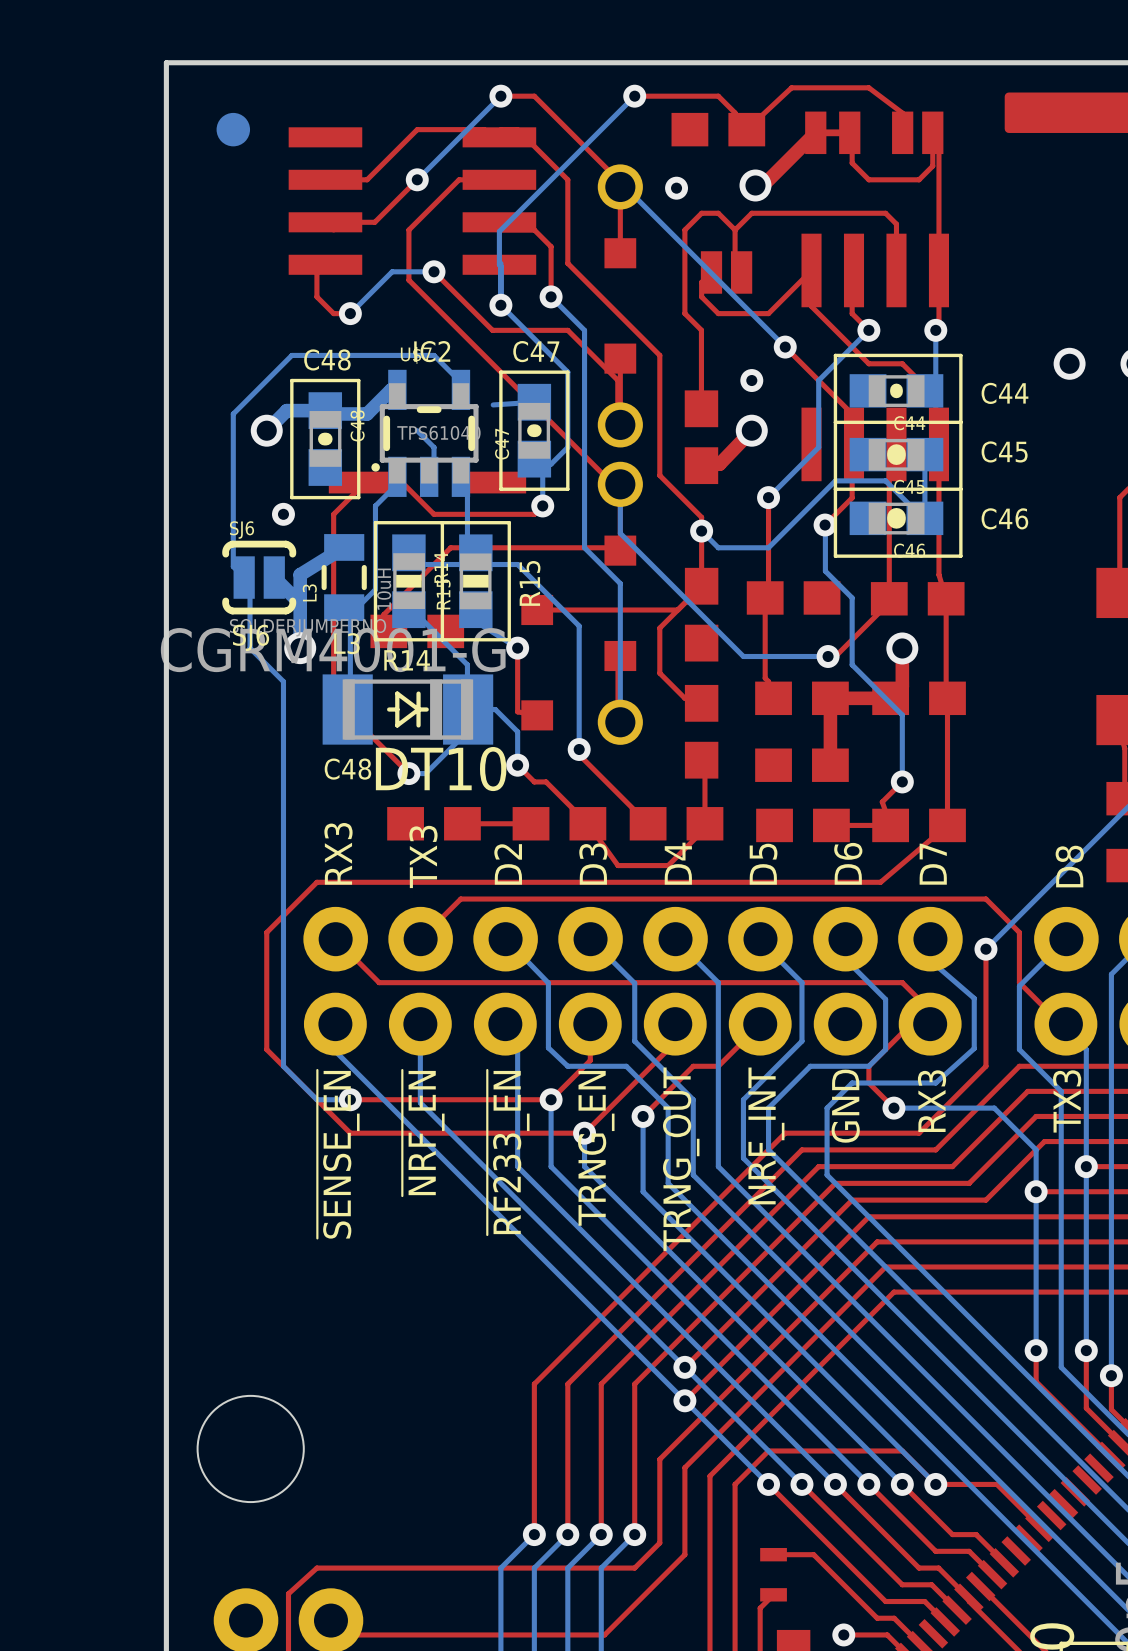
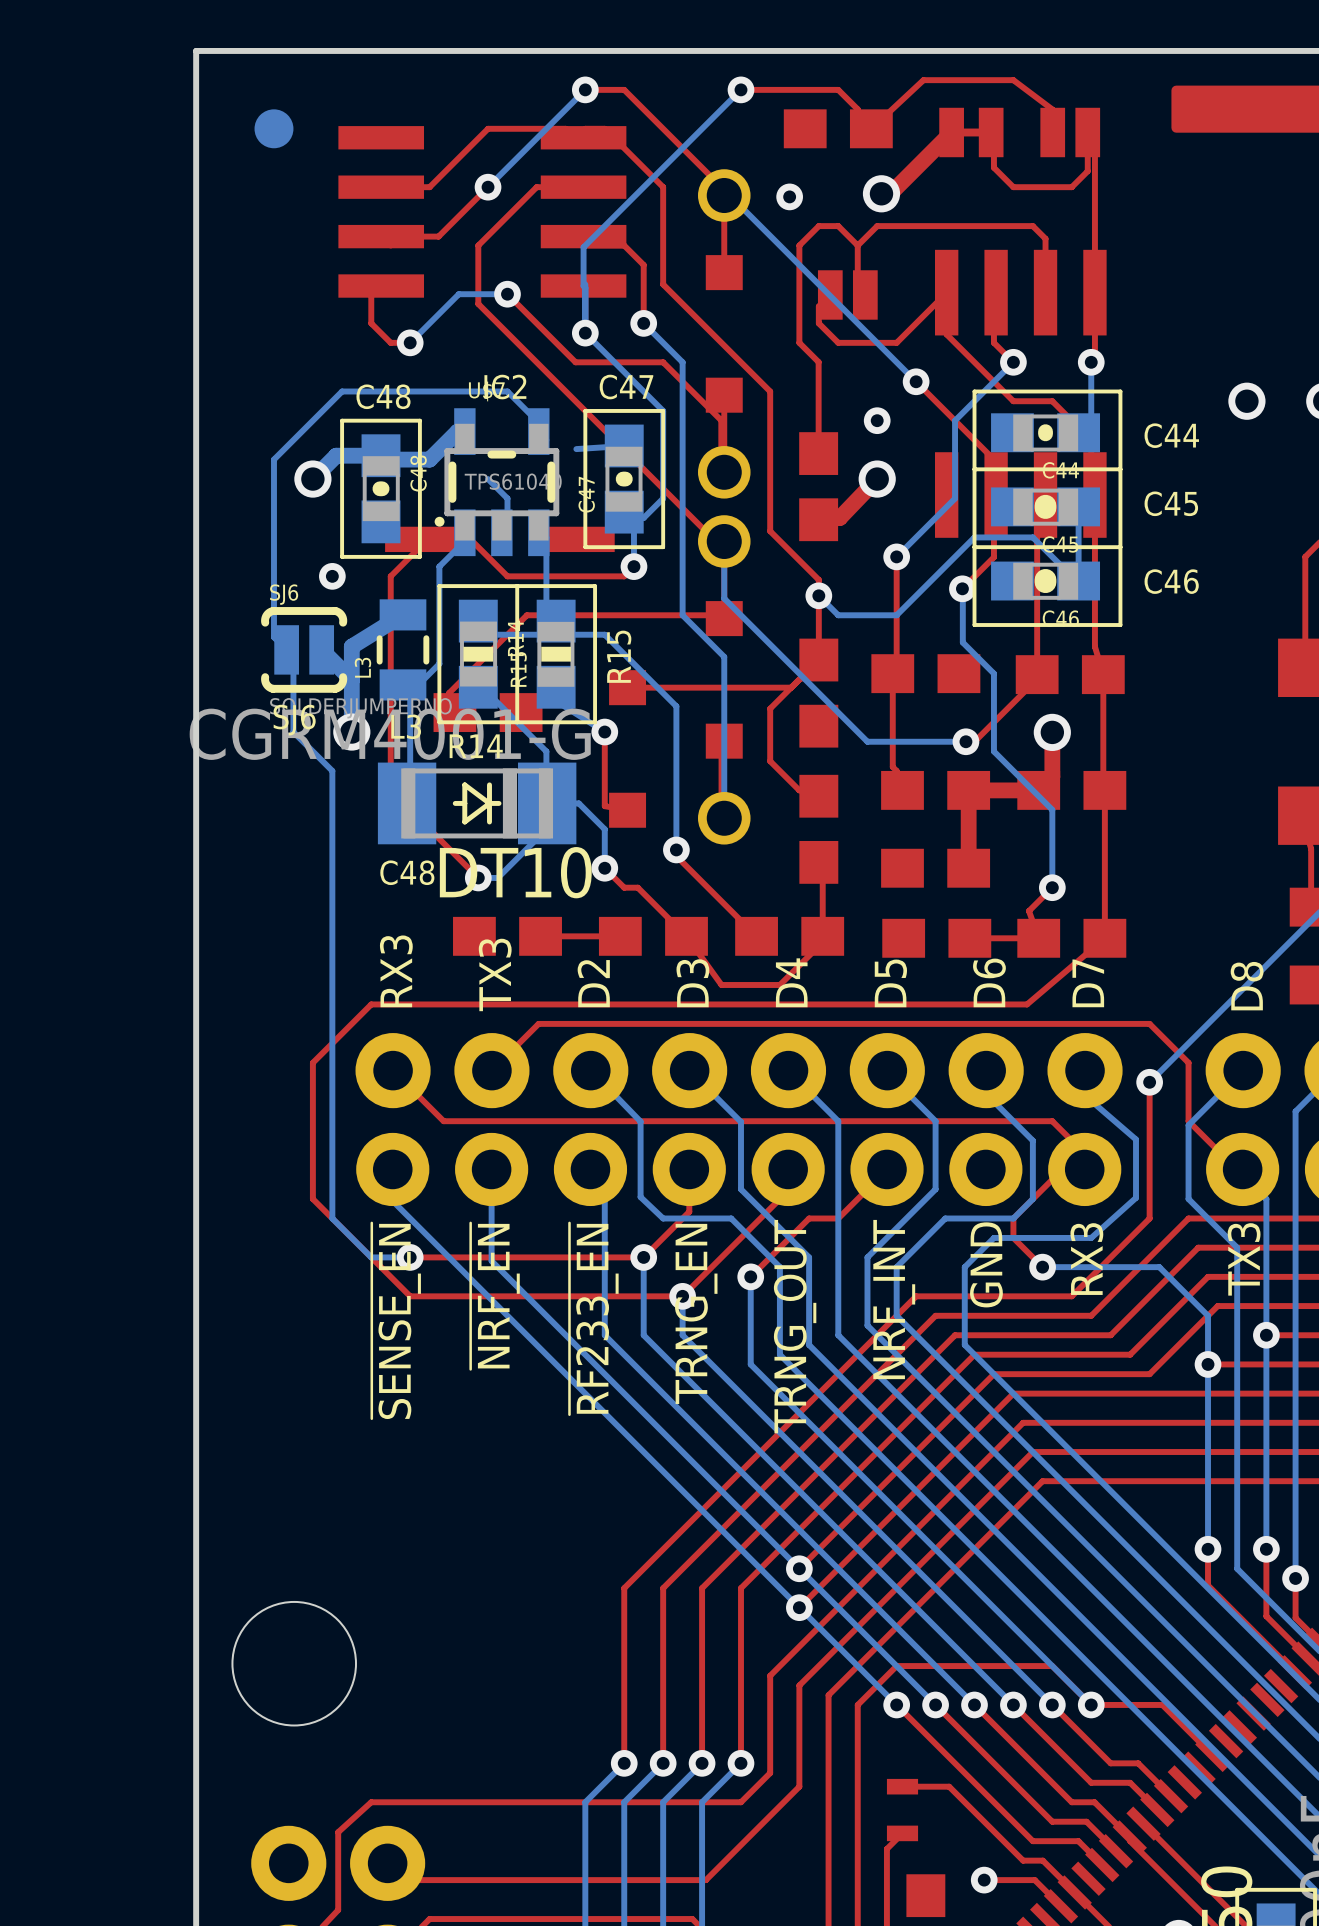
L3 value: 10uH (384, 589) -> none

